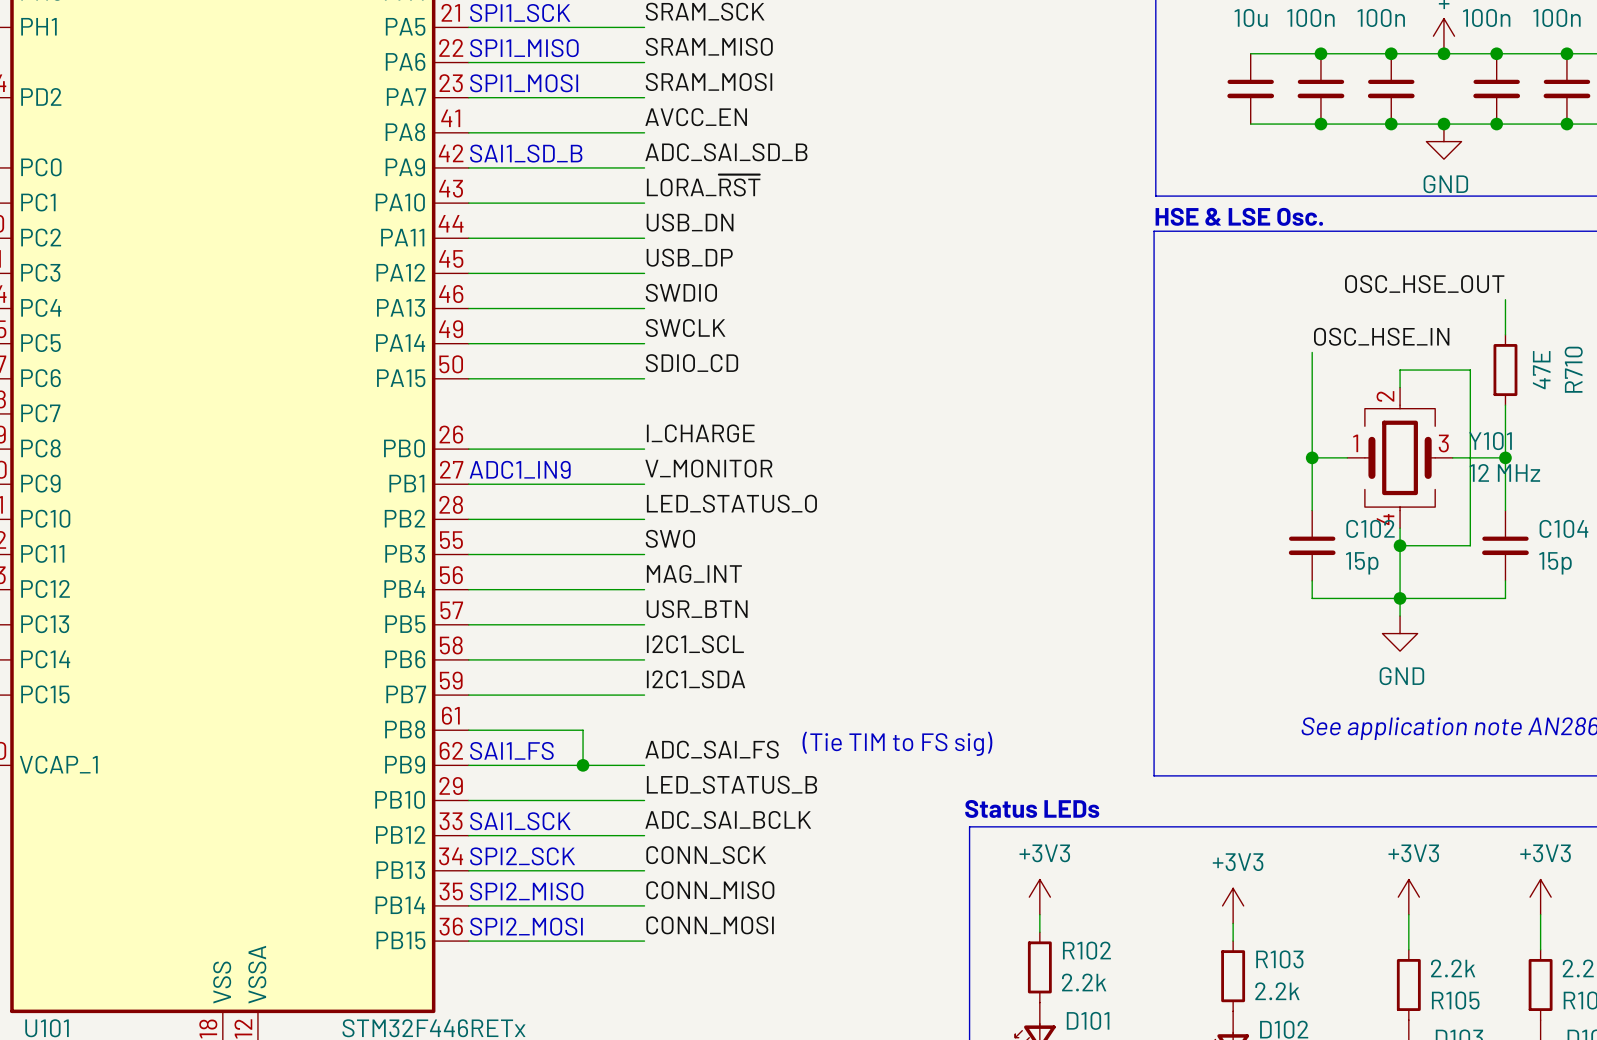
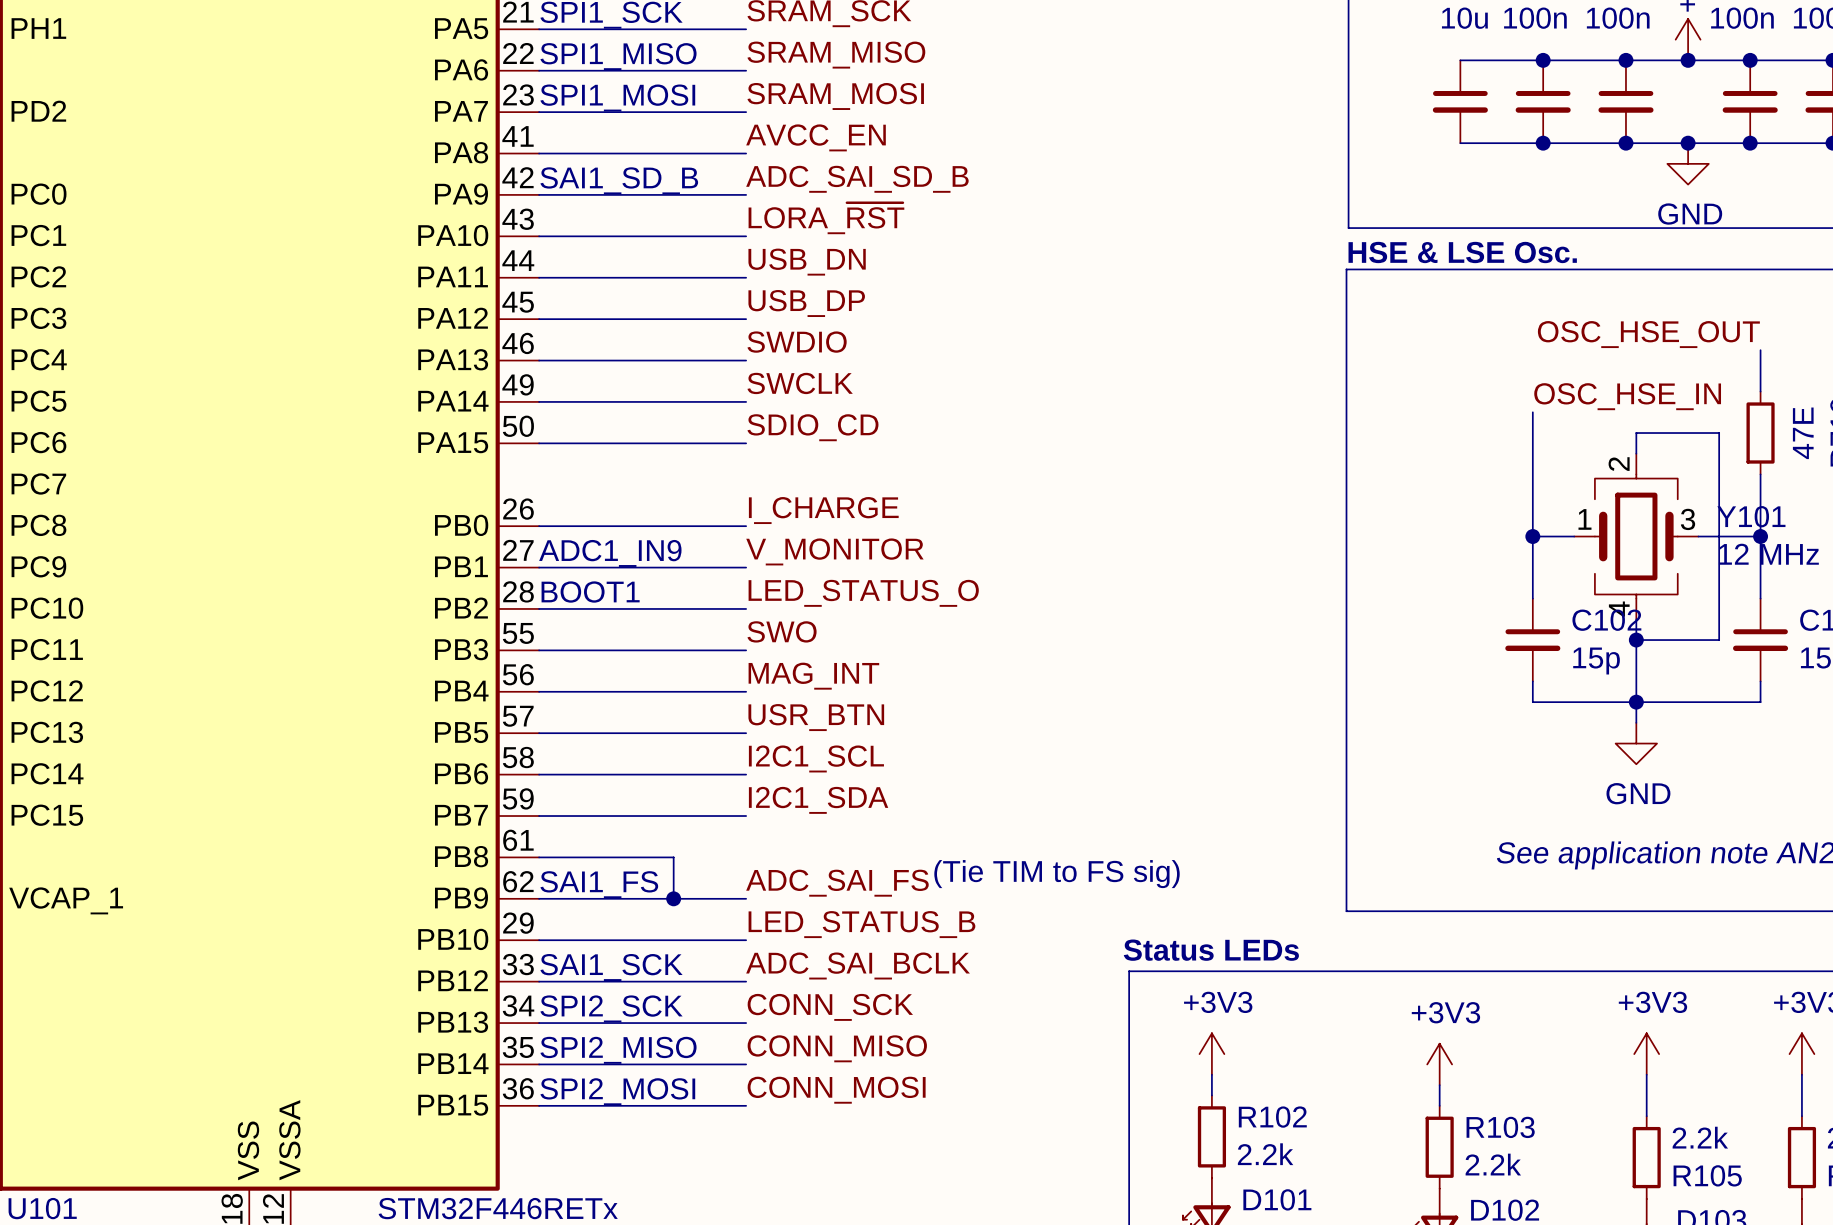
text: none -> BOOT1 (590, 592)

